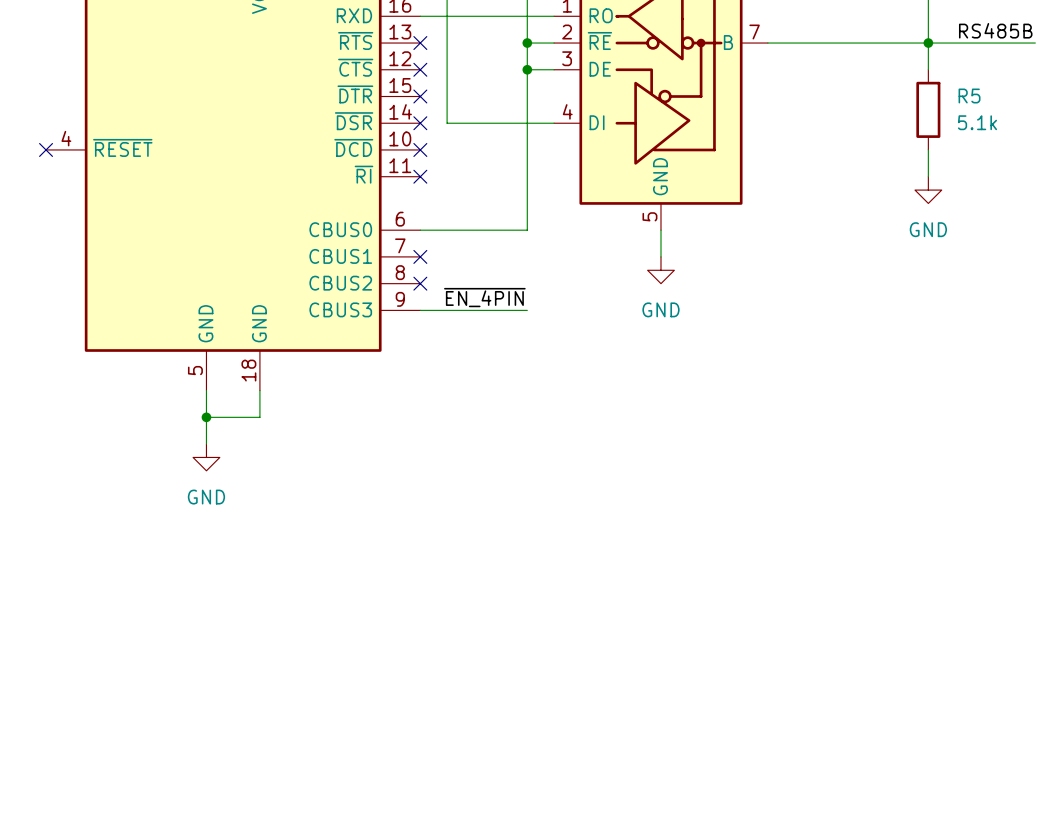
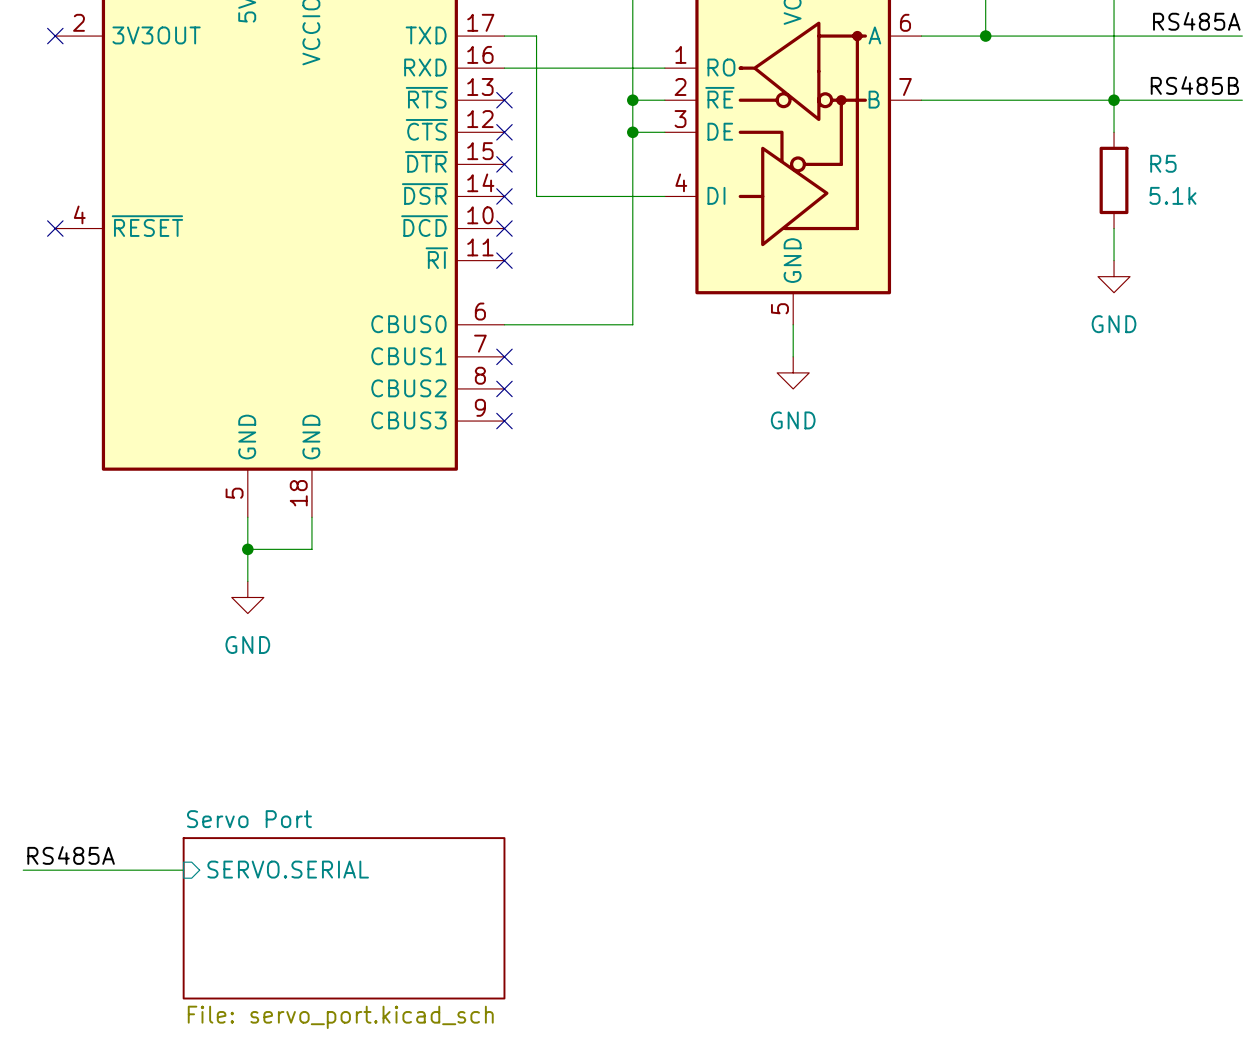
label: ~{EN_4PIN} (484, 297) -> none
wire: (420, 310) (527, 310) -> none
no-connect mark: none -> (504, 421)
label: none -> RS485A (71, 855)
wire: none -> (23, 870) (183, 870)
sheet pin: none -> SERVO.SERIAL (288, 869)
sheet Servo Port: none -> File: servo_port.kicad_sch (344, 918)

